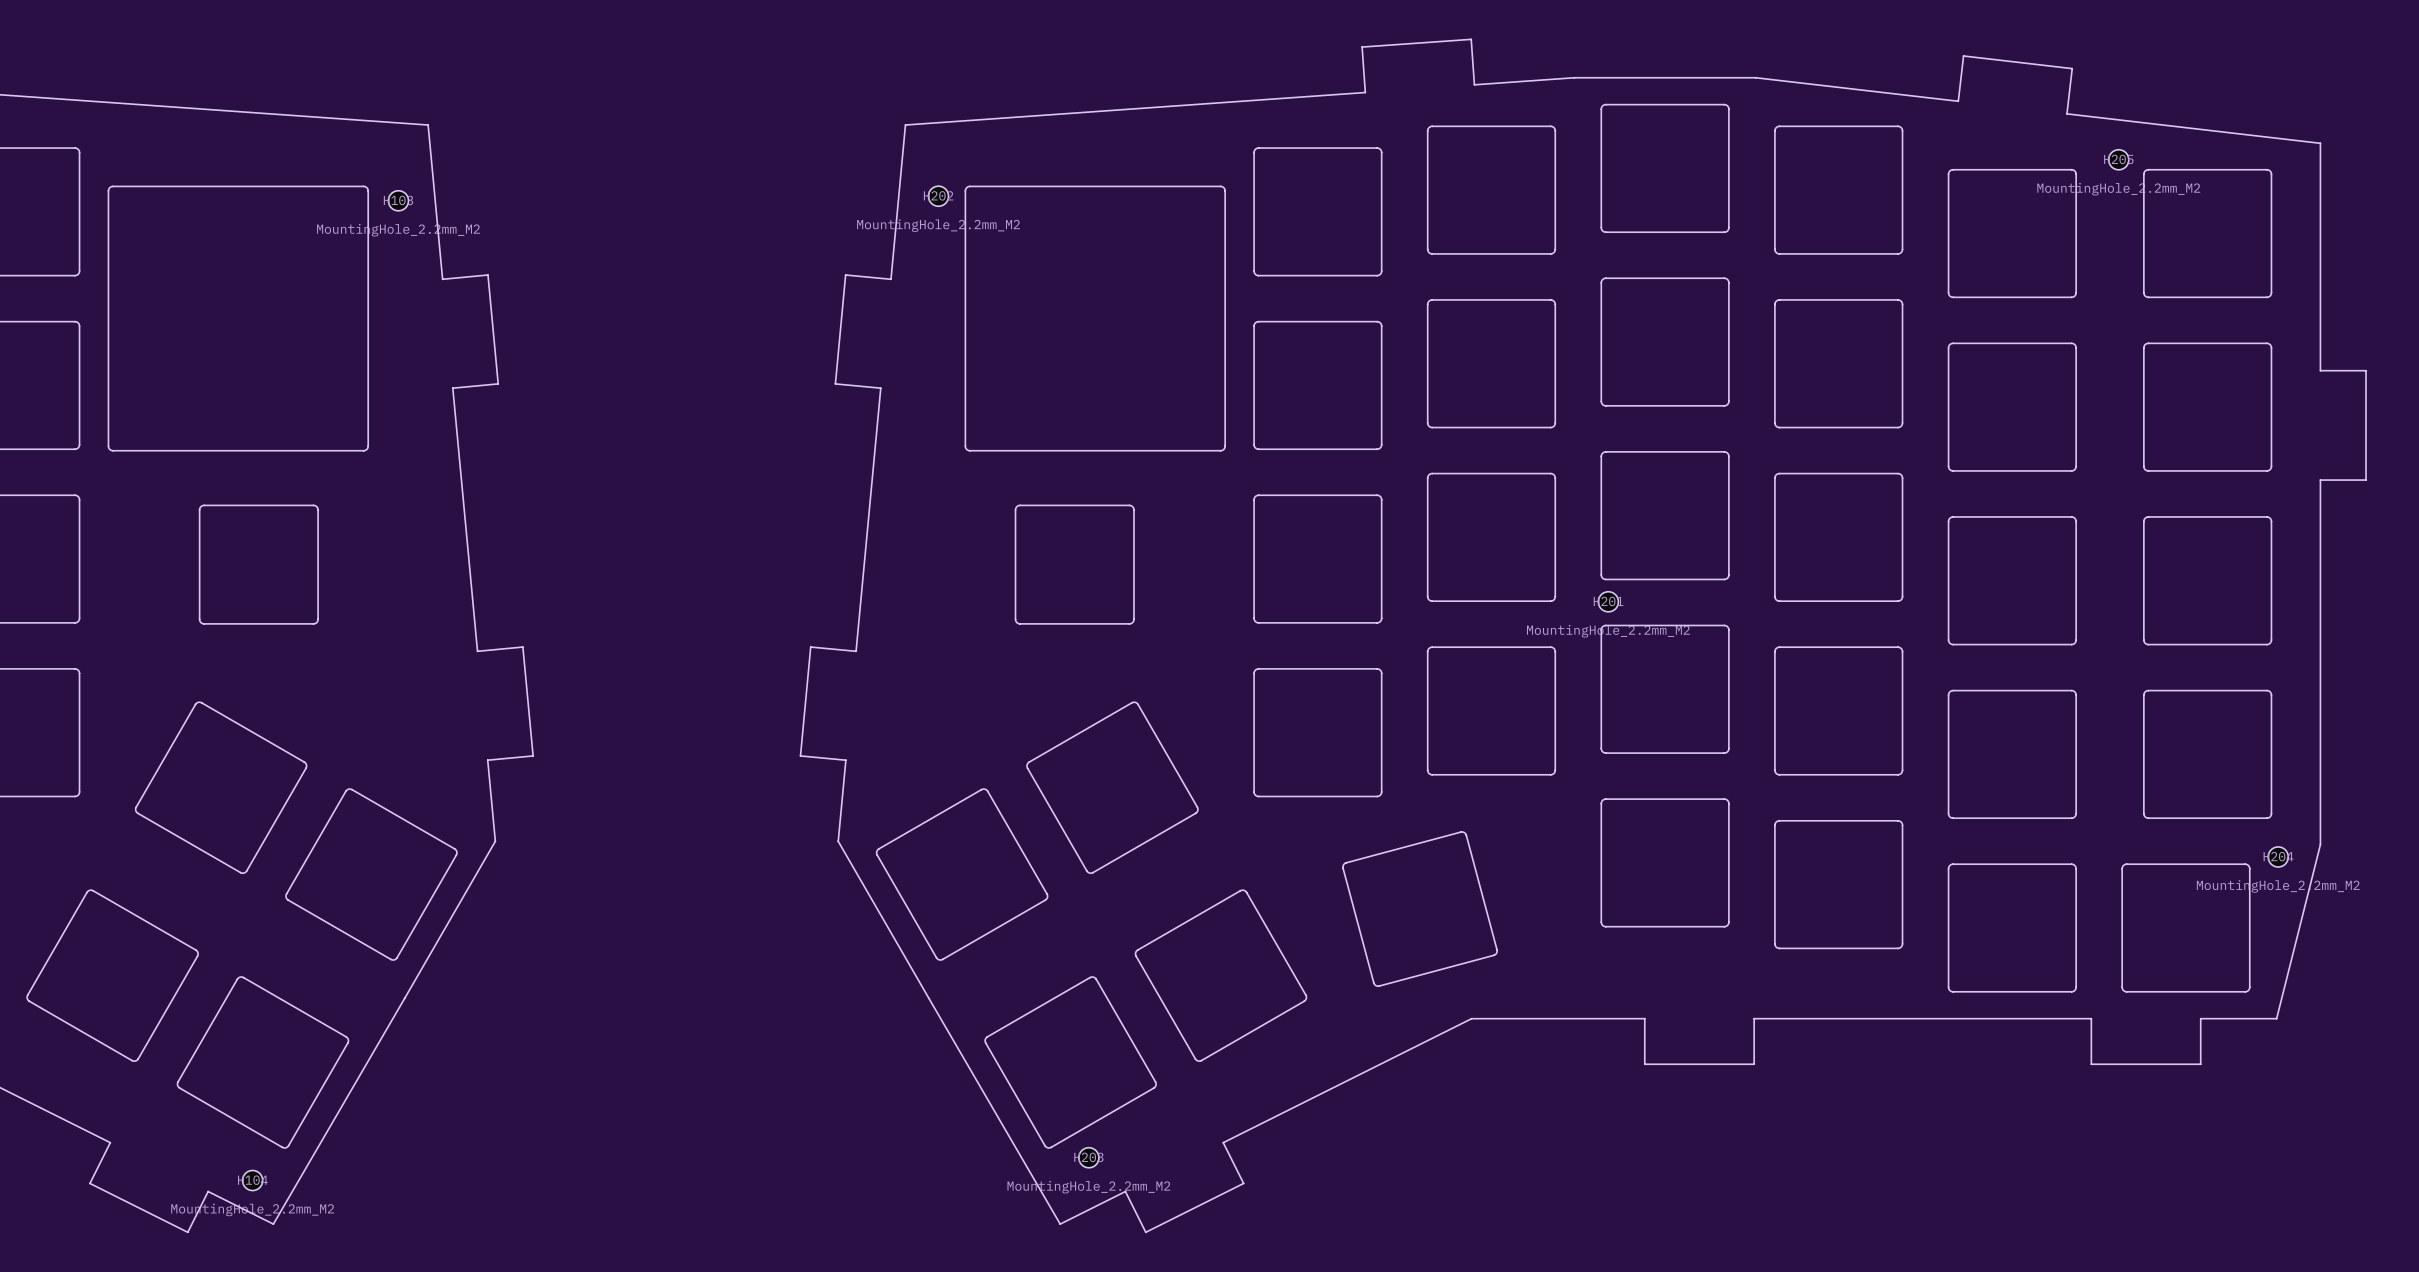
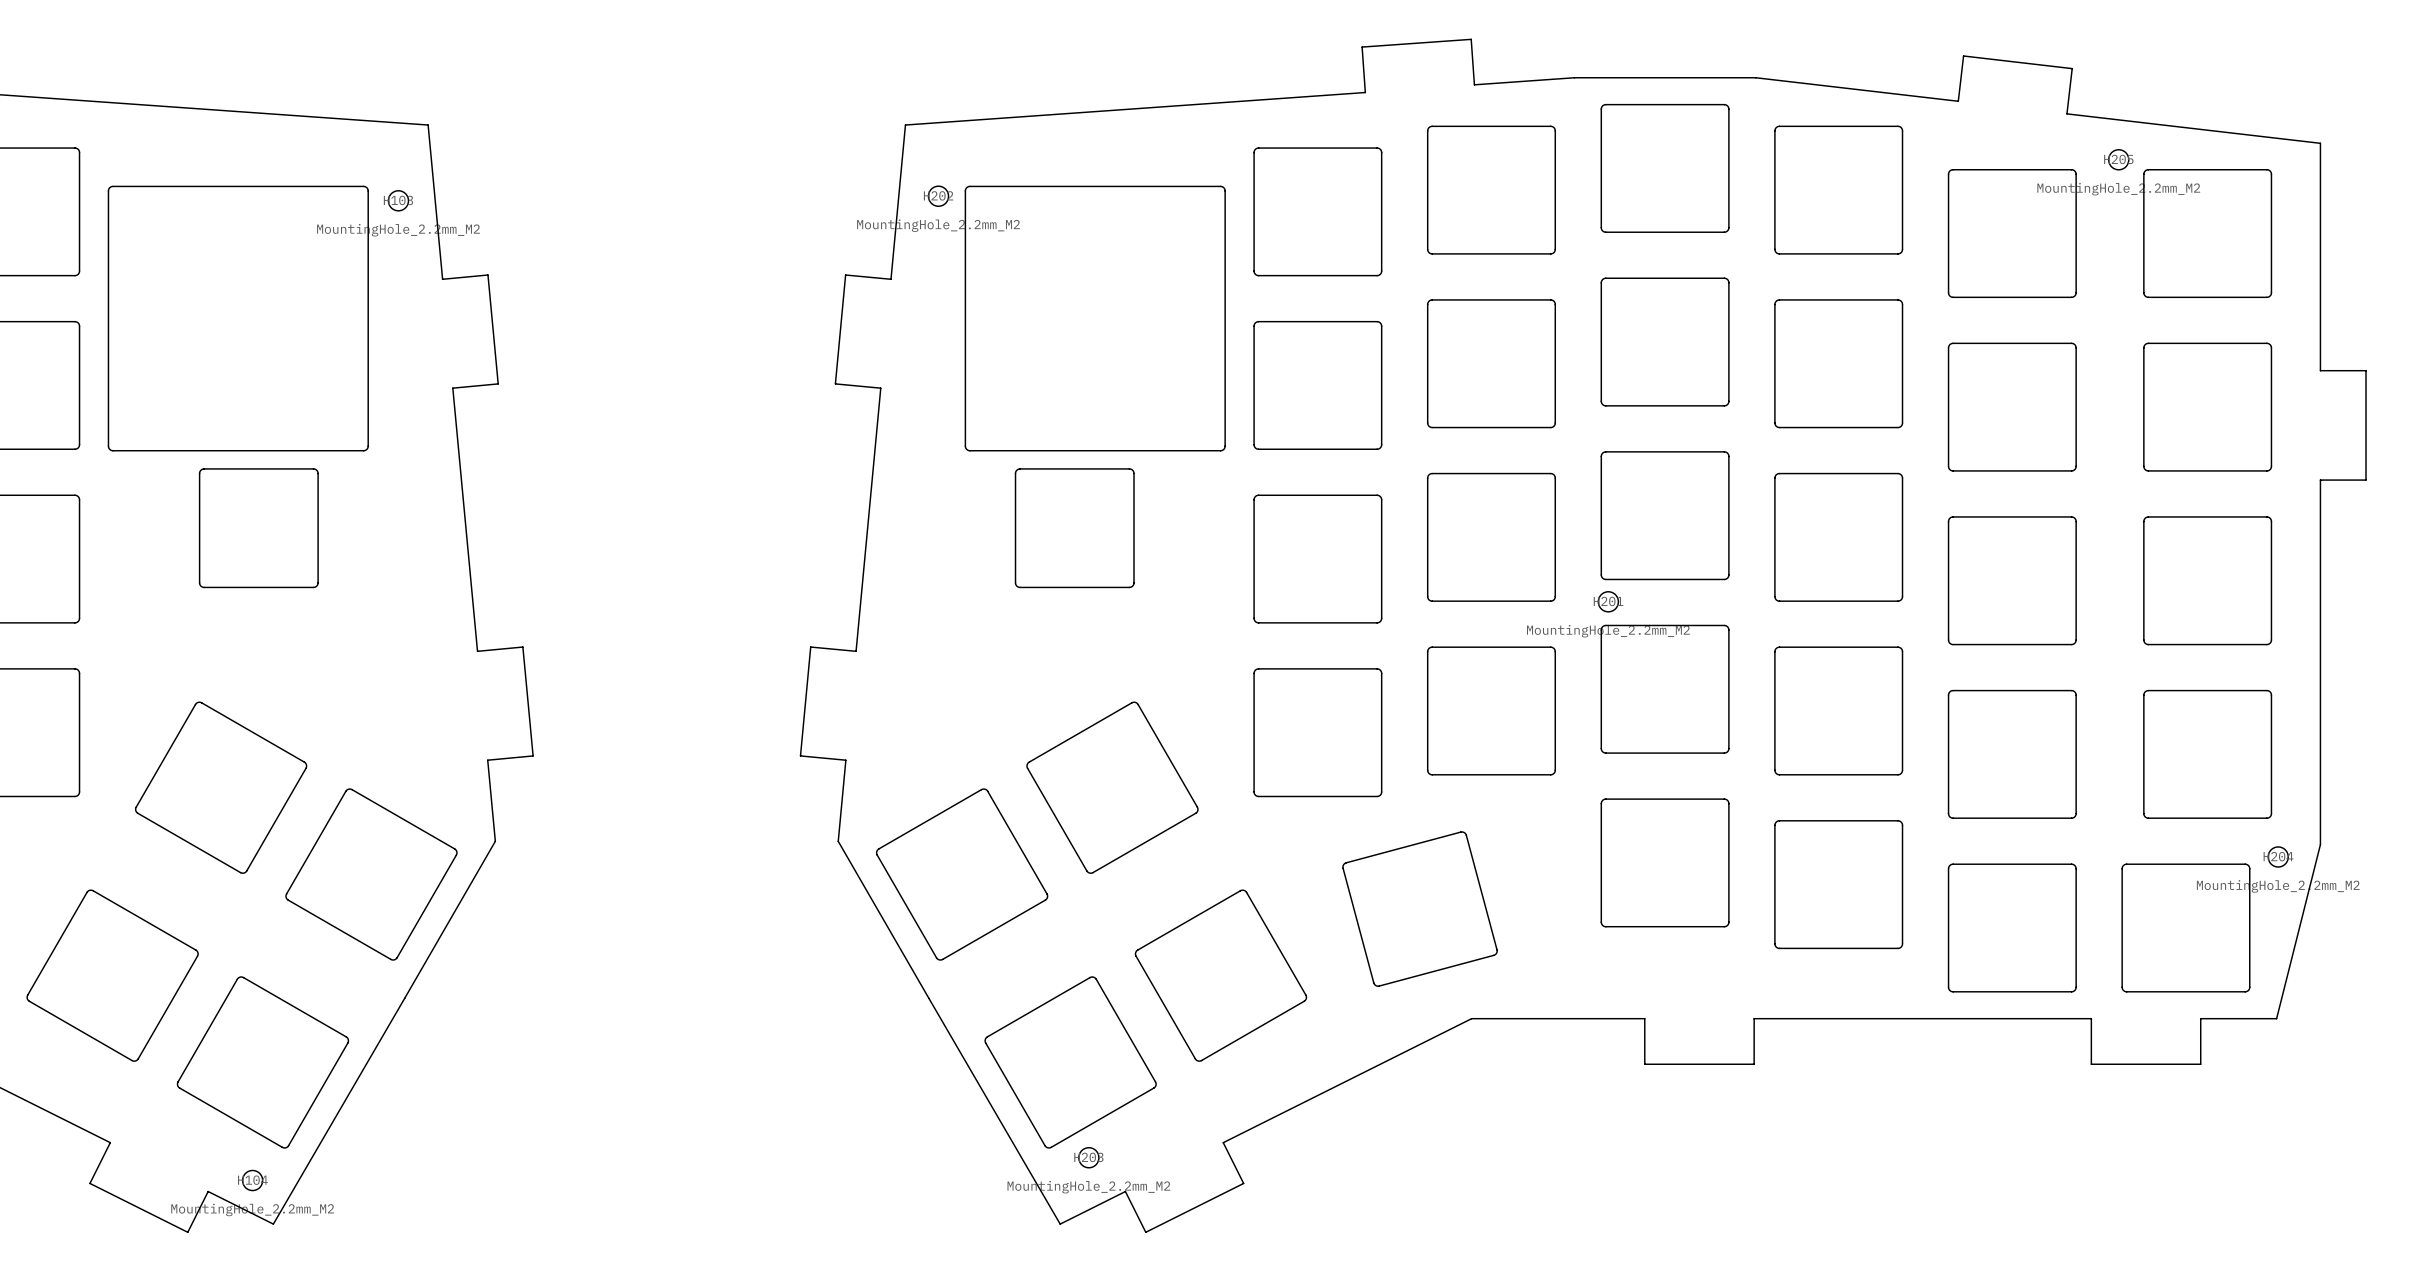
board edge: (199, 509) (204, 505) (313, 505) (318, 509) -> (199, 509) (199, 473) (204, 468) (315, 469) (318, 473) (318, 509)
board edge: (1015, 509) (1020, 505) (1129, 505) (1133, 509) -> (1015, 509) (1015, 473) (1020, 468) (1130, 469) (1133, 473) (1133, 509)
board edge: (199, 582) (199, 619) (204, 623) (315, 623) (318, 619) (318, 582) -> (199, 582) (204, 587) (313, 587) (318, 582)
board edge: (1015, 582) (1015, 619) (1020, 623) (1131, 623) (1133, 619) (1133, 582) -> (1015, 582) (1020, 587) (1129, 587) (1133, 582)

